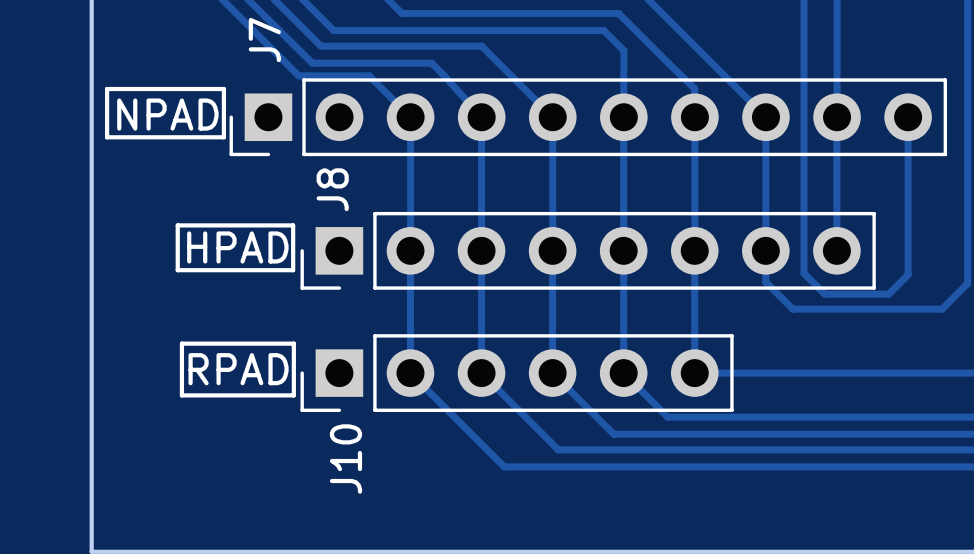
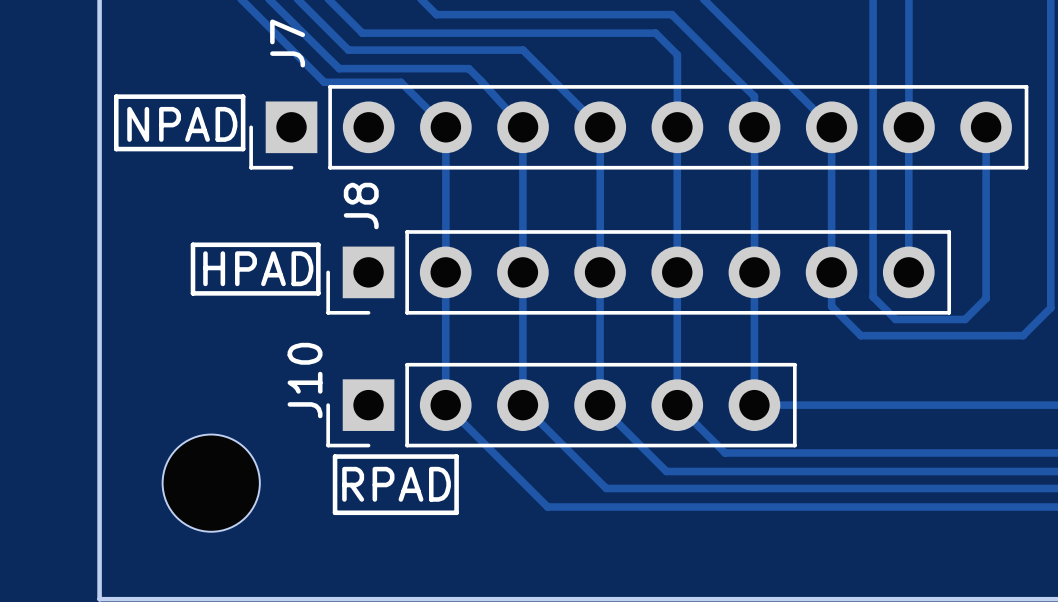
line: (181, 343) (293, 343) (293, 395) (181, 395) (181, 343) -> (335, 456) (456, 456) (456, 512) (335, 512) (335, 456)
text position: RPAD (238, 369) -> RPAD (396, 484)
part: none -> (211, 483)
J10 name position: J10 (345, 459) -> J10 (305, 380)

